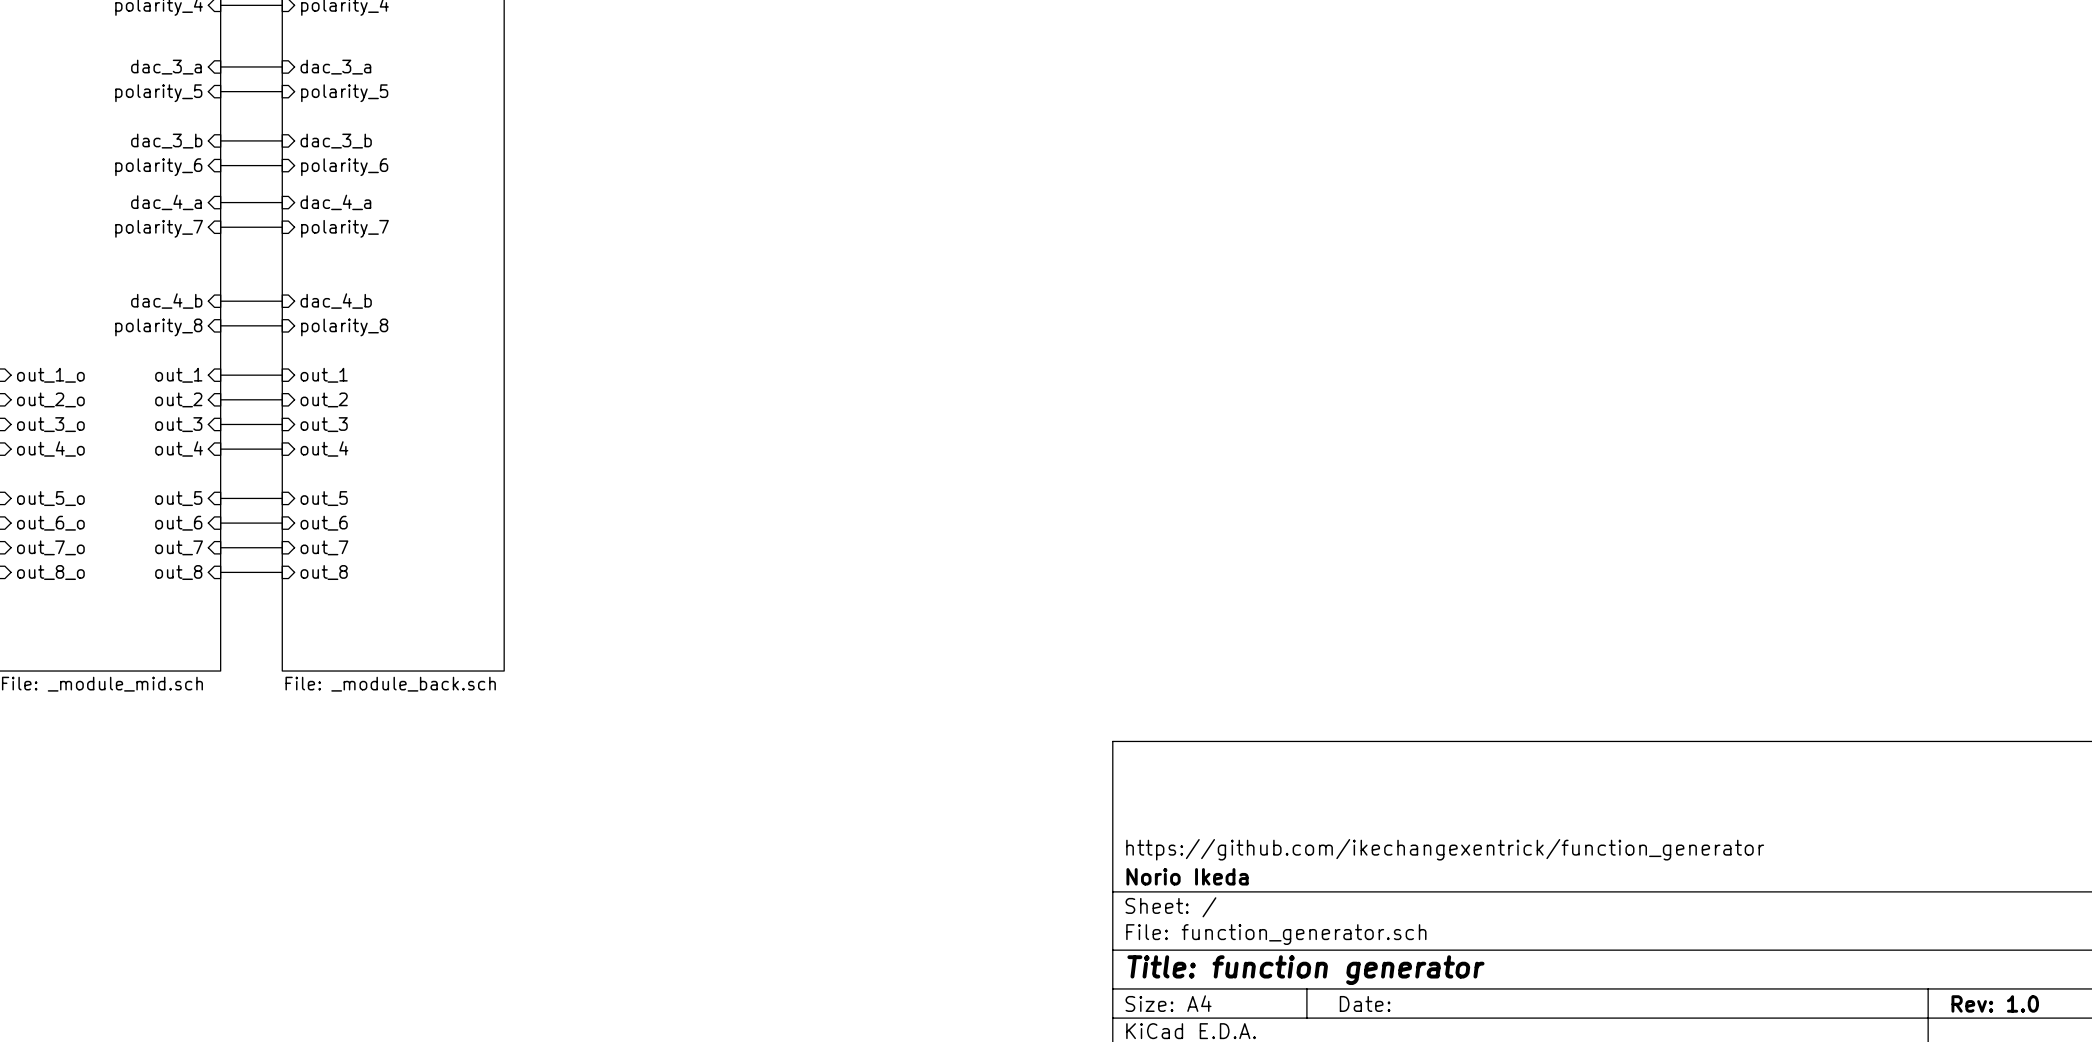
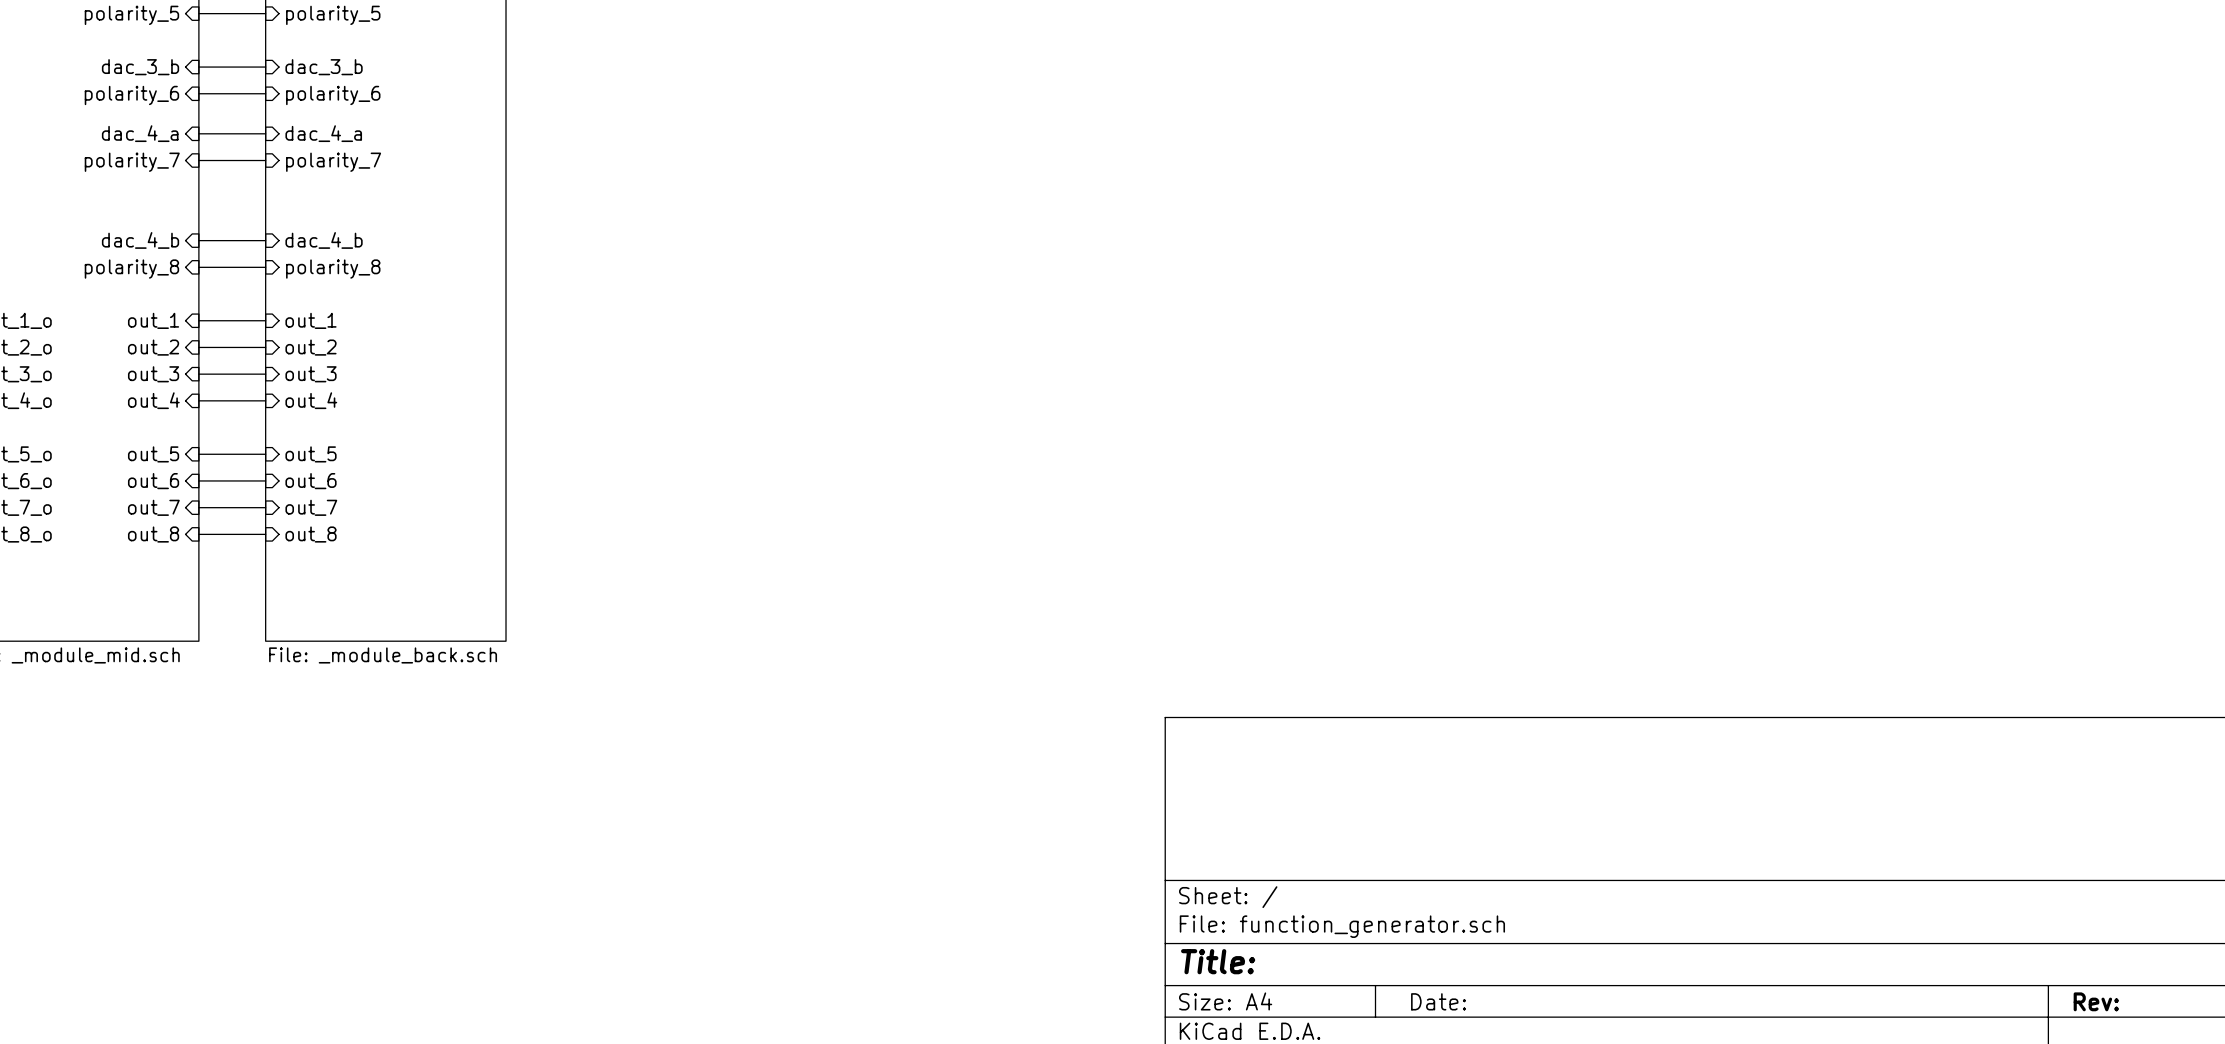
title block: https://github.com/ikechangexentrick/function_generator (1445, 849) -> none
title block: Norio Ikeda (1187, 876) -> none
title block: Title: function generator (1305, 970) -> Title: (1218, 961)
title block: Rev: 1.0 (1995, 1003) -> Rev: (2096, 1001)

